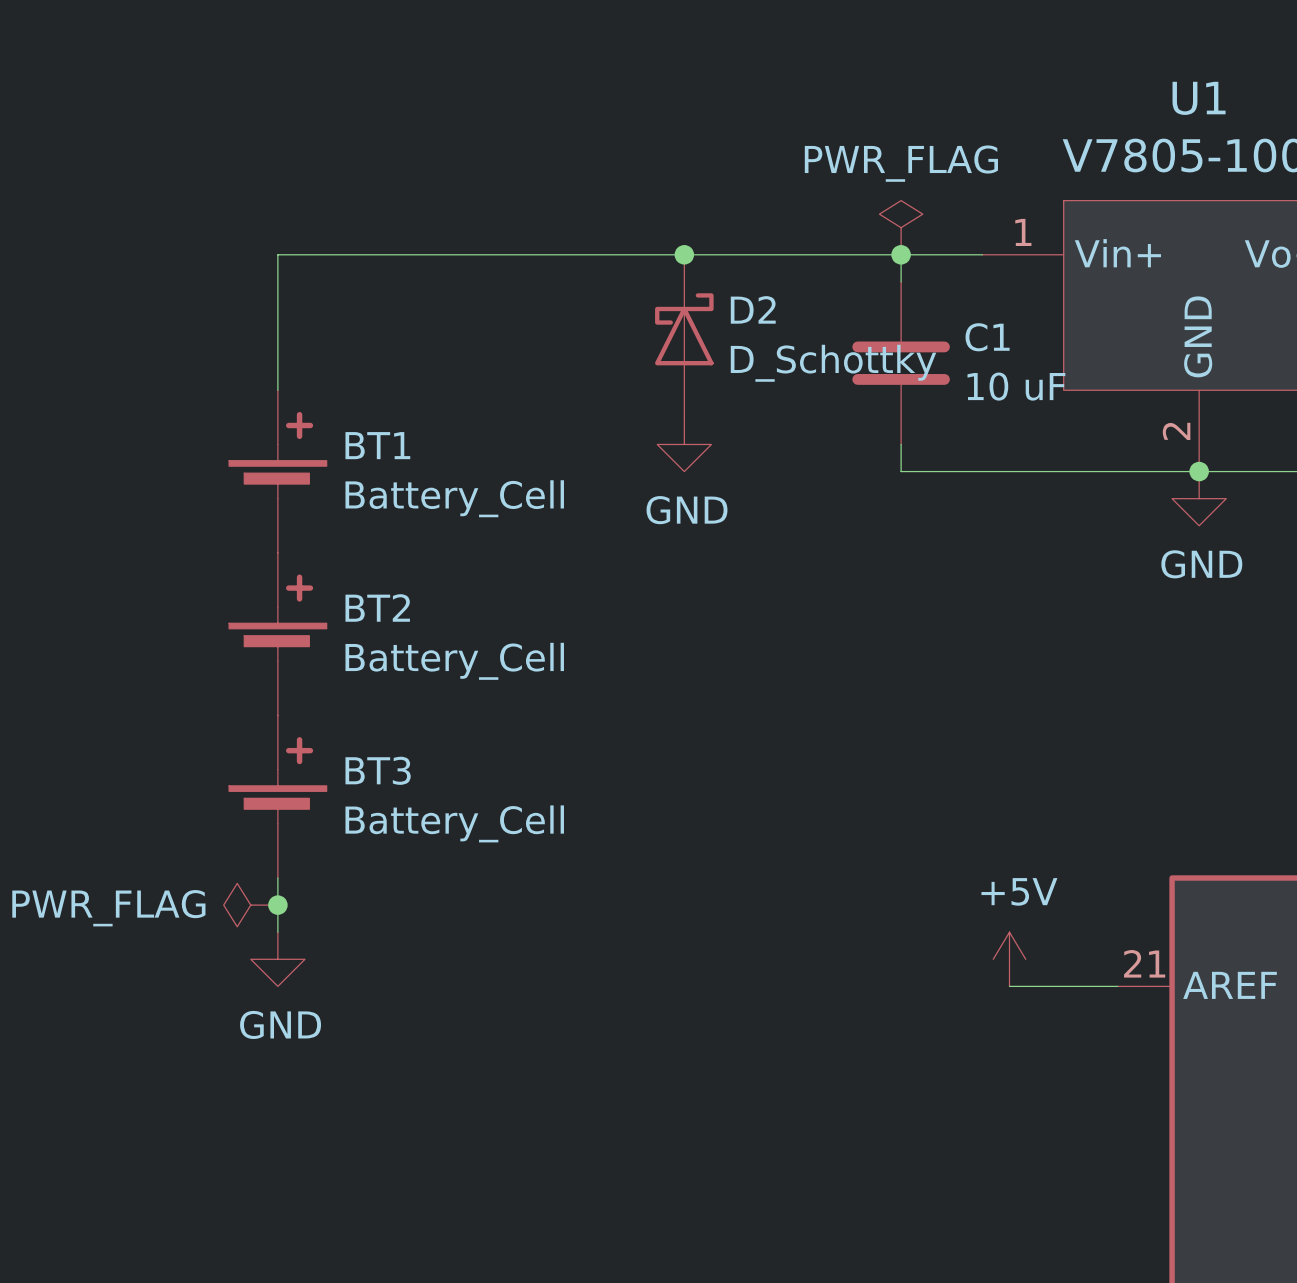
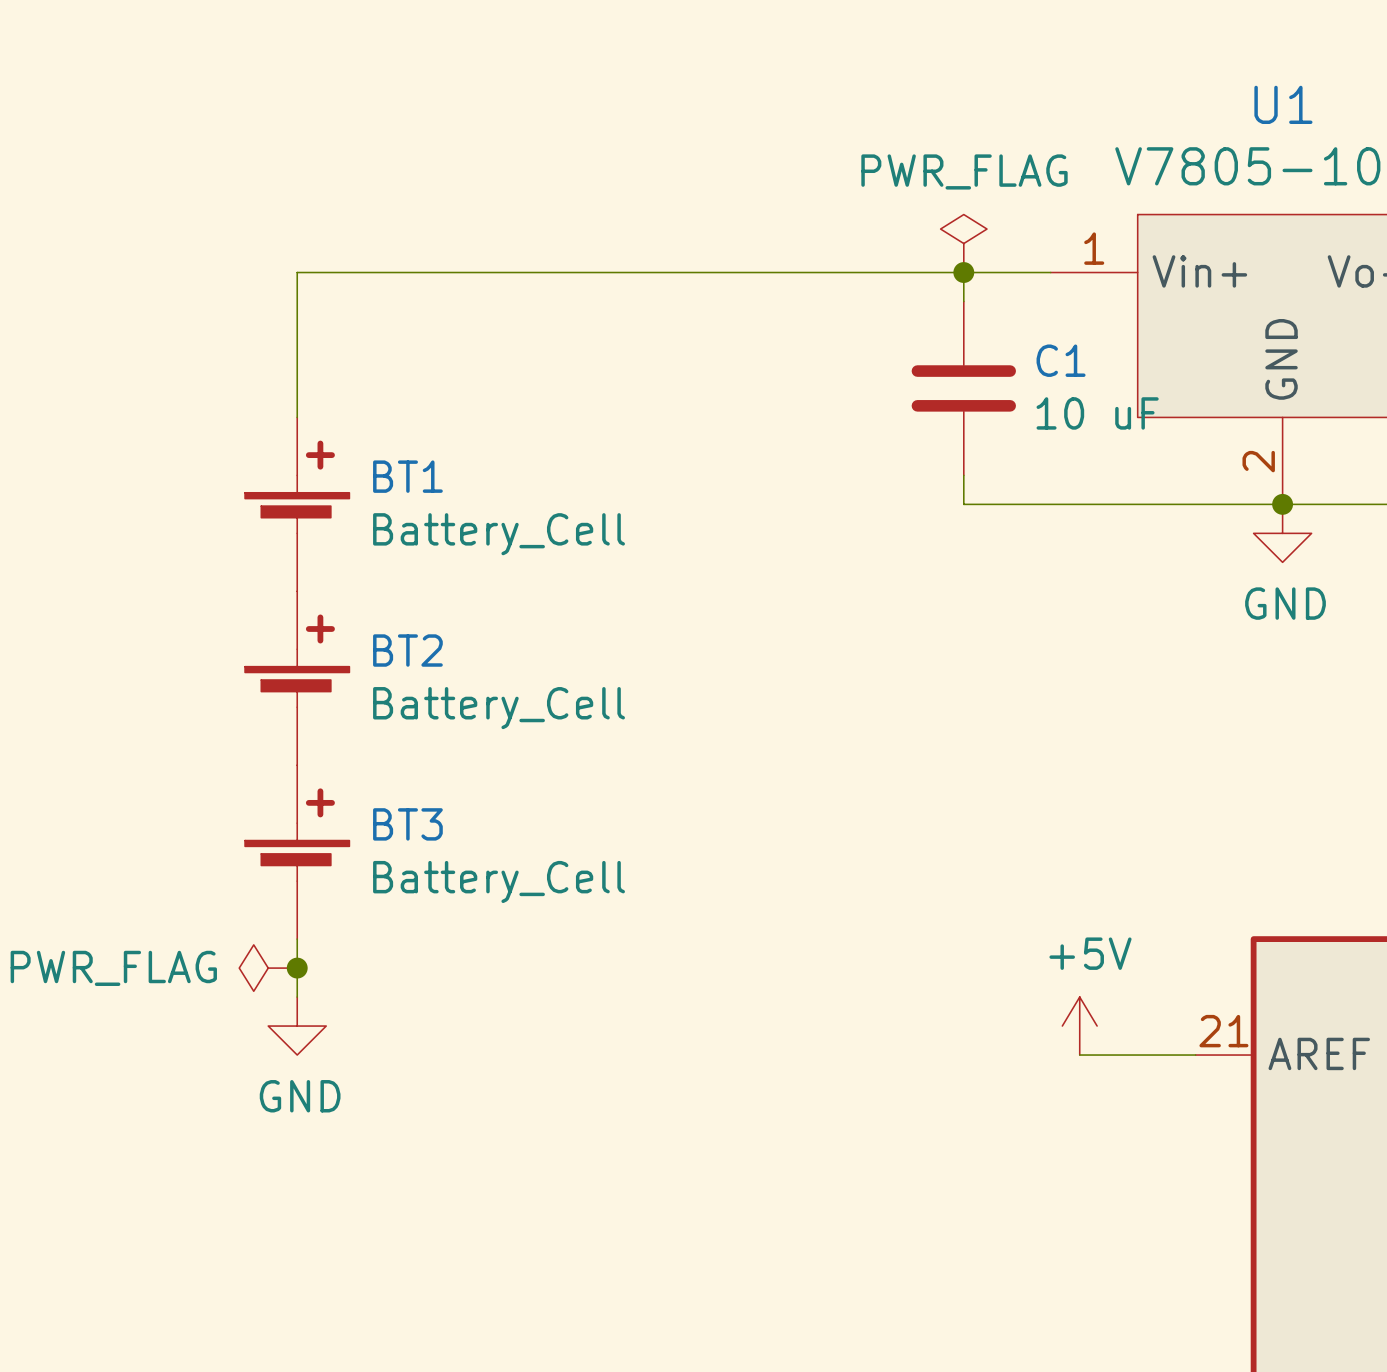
junction: (684, 254) -> none
D2: D_Schottky (684, 336) -> none
power symbol: GND (684, 444) -> none

